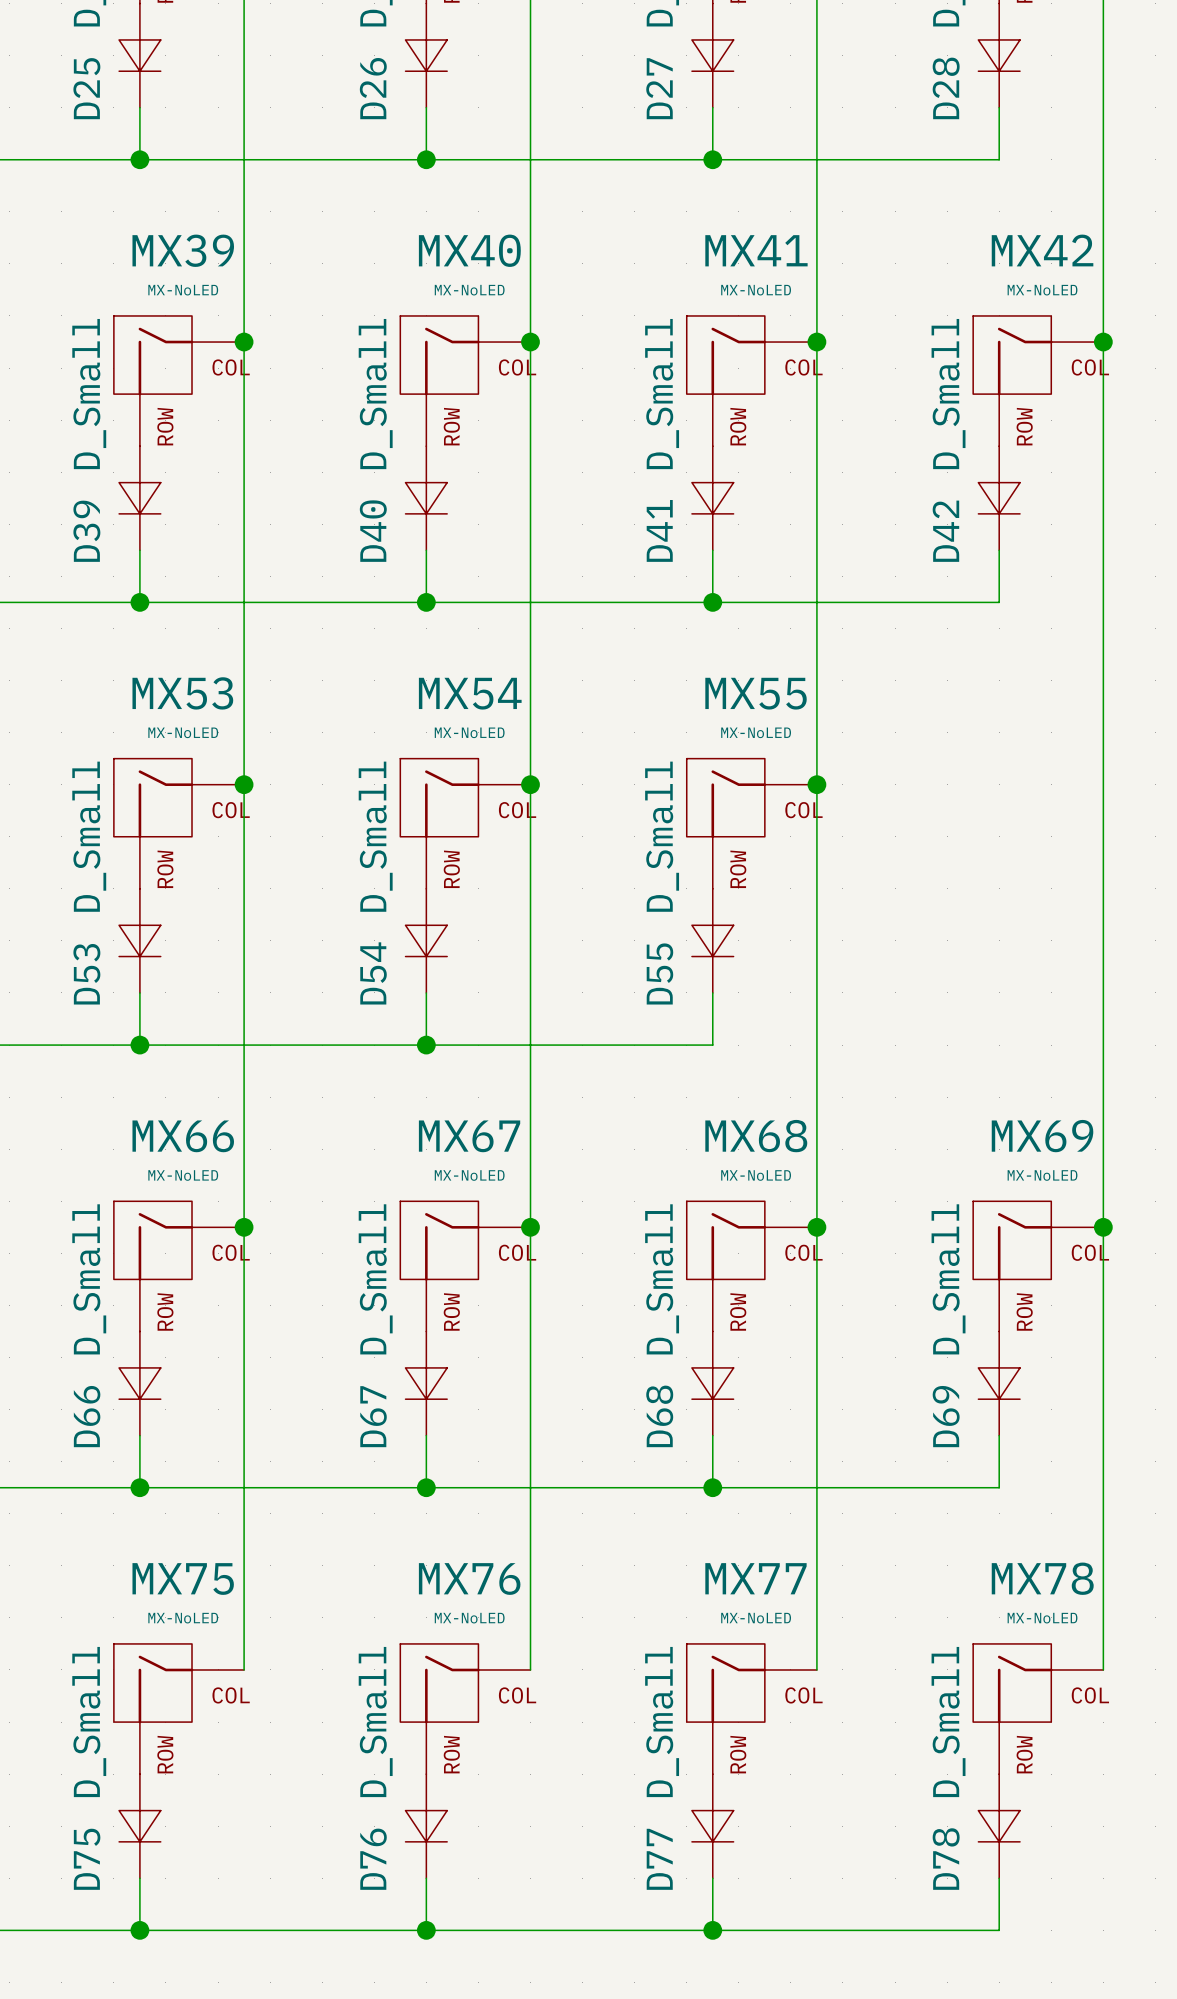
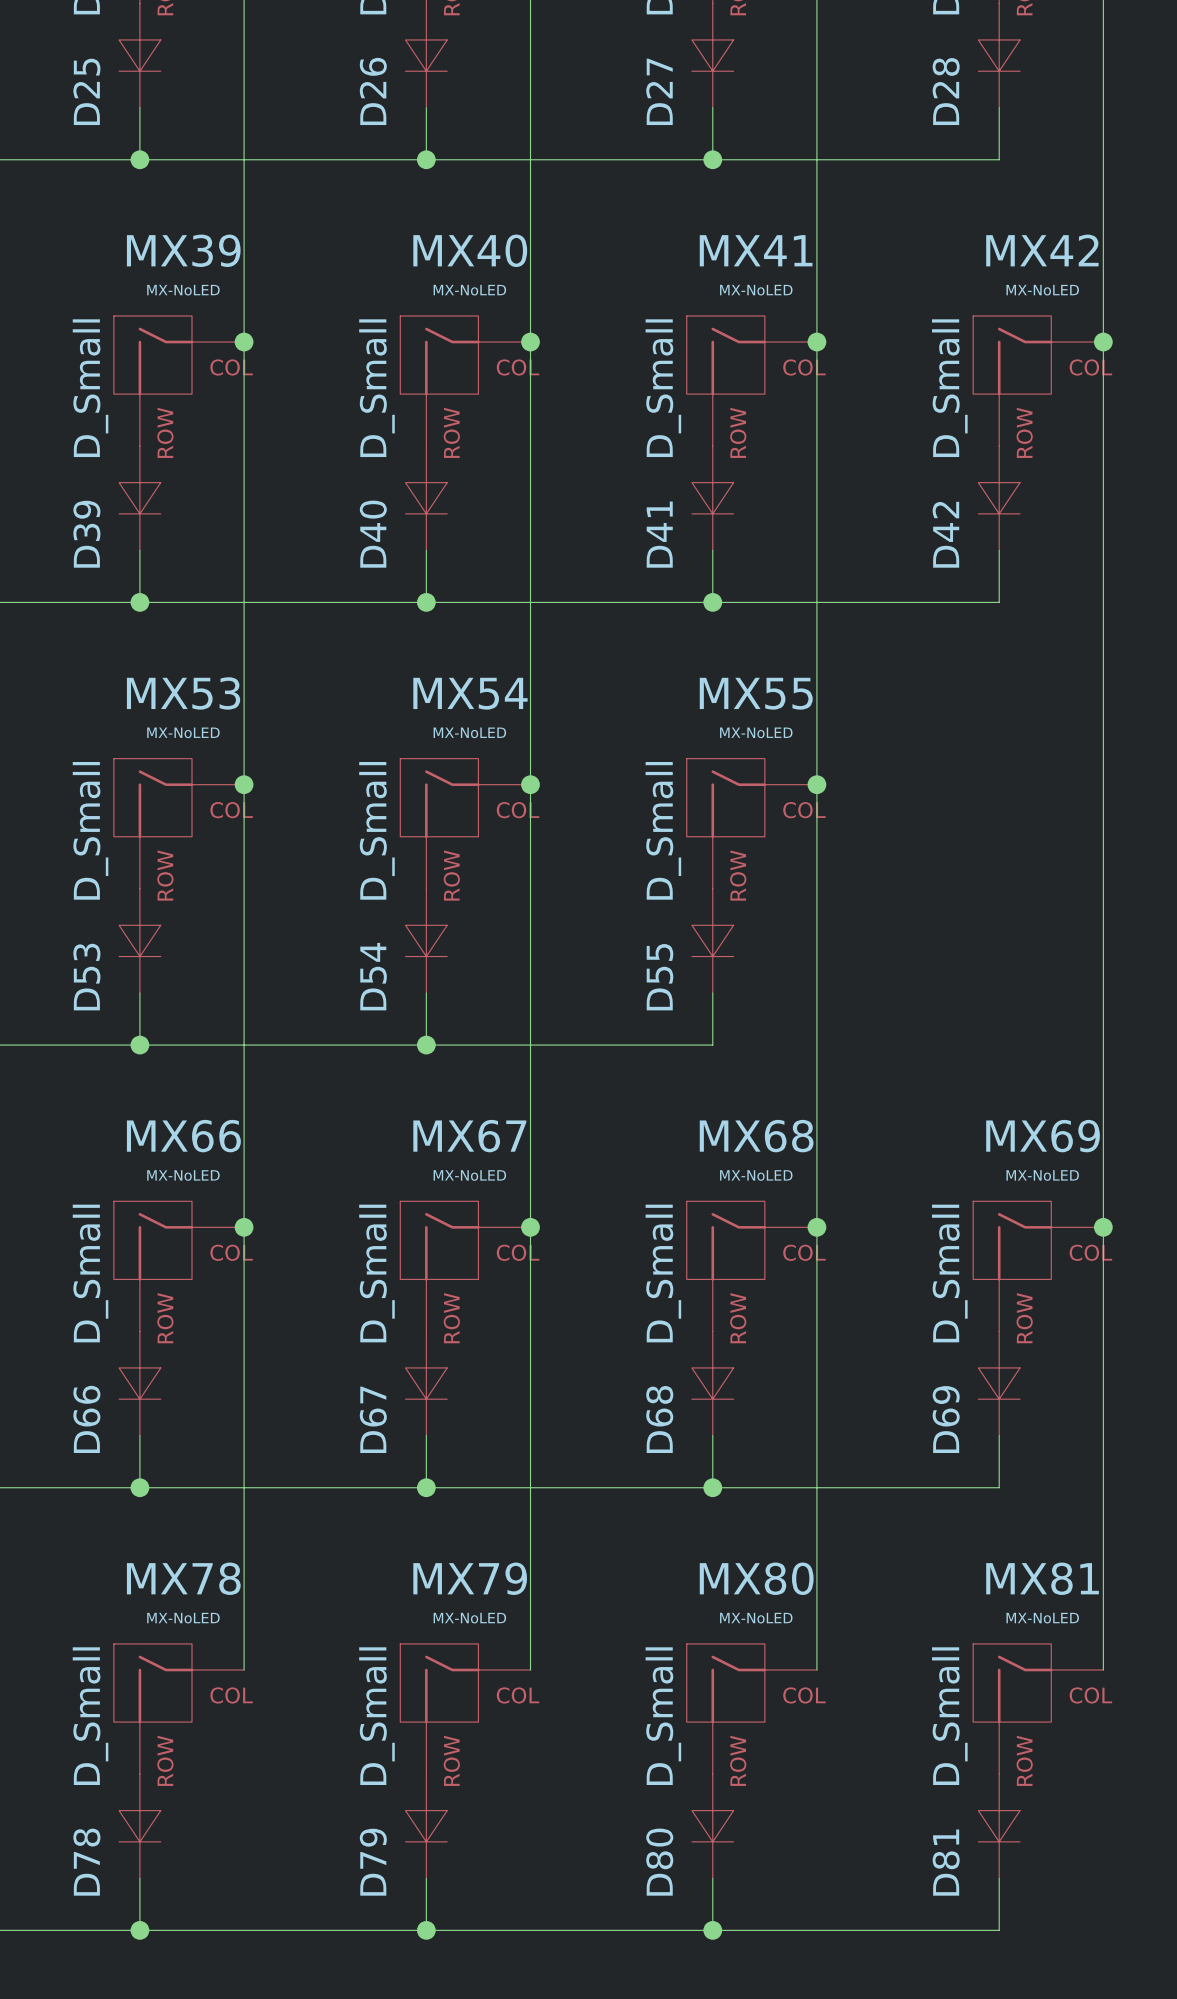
MX77 name: MX77 (755, 1578) -> MX80 (756, 1578)
MX78 name: MX78 (1042, 1578) -> MX81 (1042, 1578)
MX75 name: MX75 (183, 1579) -> MX78 (183, 1578)
MX76 name: MX76 (469, 1579) -> MX79 (470, 1578)
D75 name: D75 (87, 1859) -> D78 (86, 1862)
D76 name: D76 (373, 1859) -> D79 (373, 1862)
D77 name: D77 (659, 1859) -> D80 (659, 1862)
D78 name: D78 (946, 1859) -> D81 (946, 1862)

